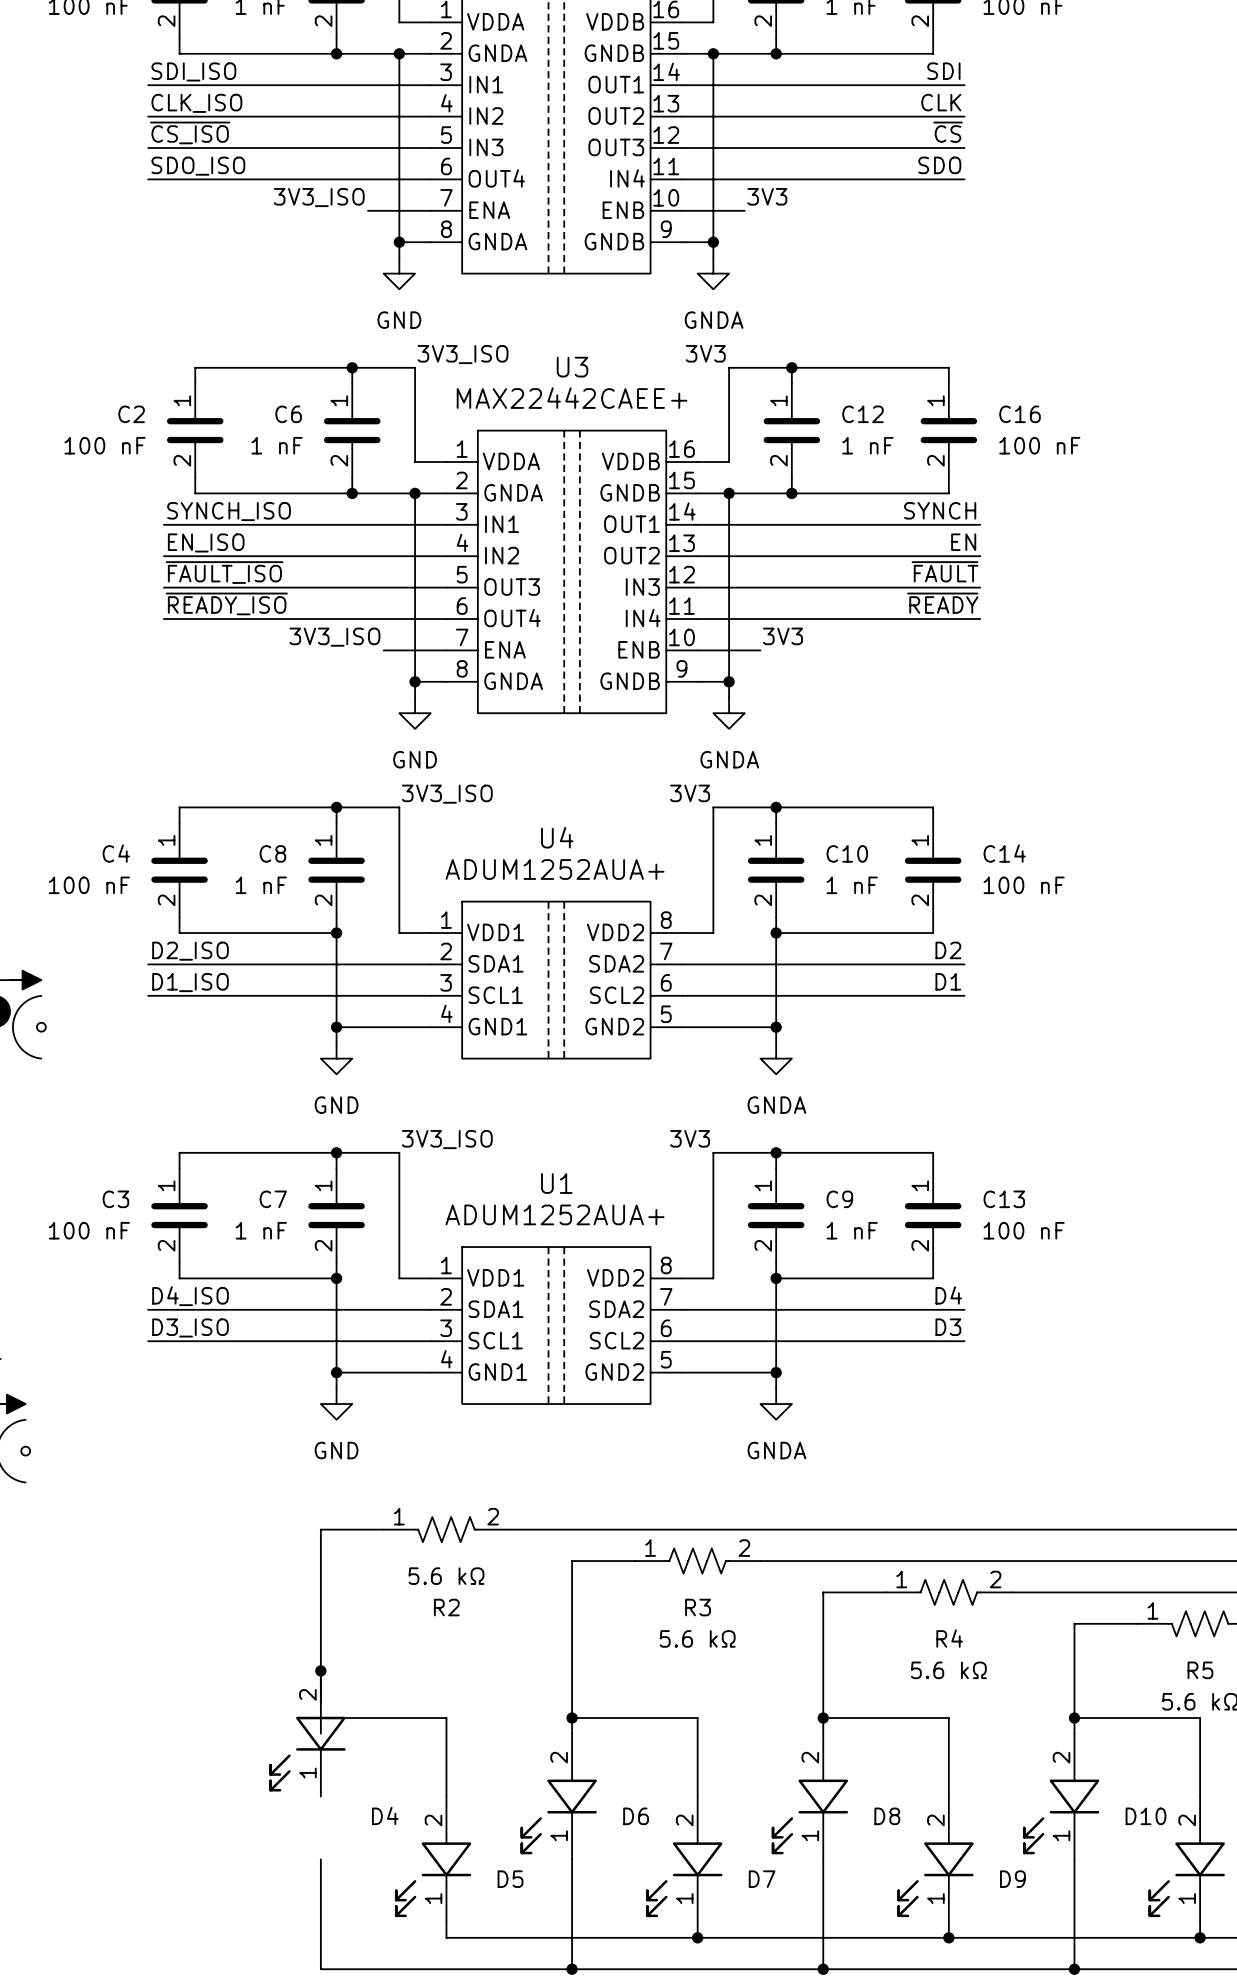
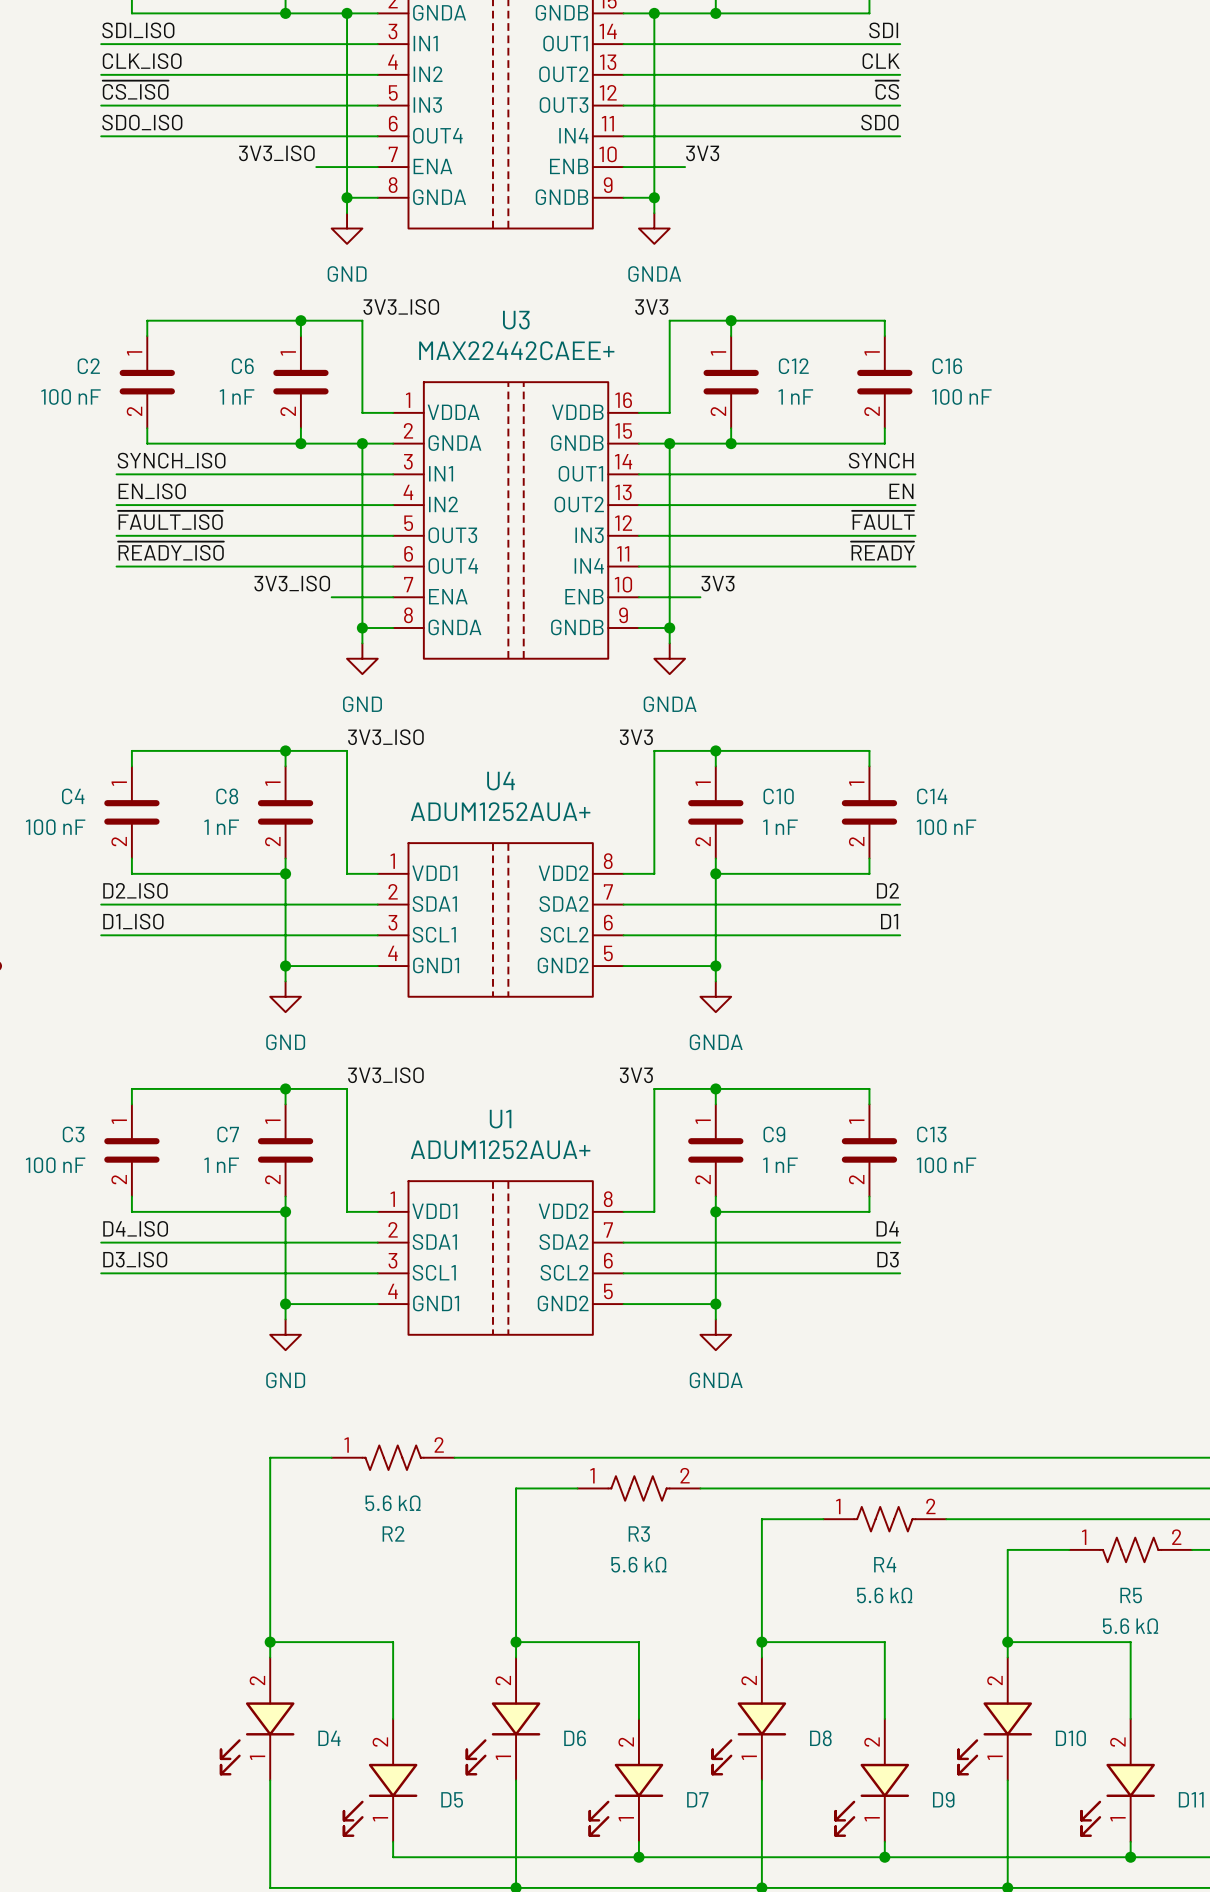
junction position: (320, 1670) -> (270, 1642)
D4 position: (307, 1733) -> (257, 1718)

